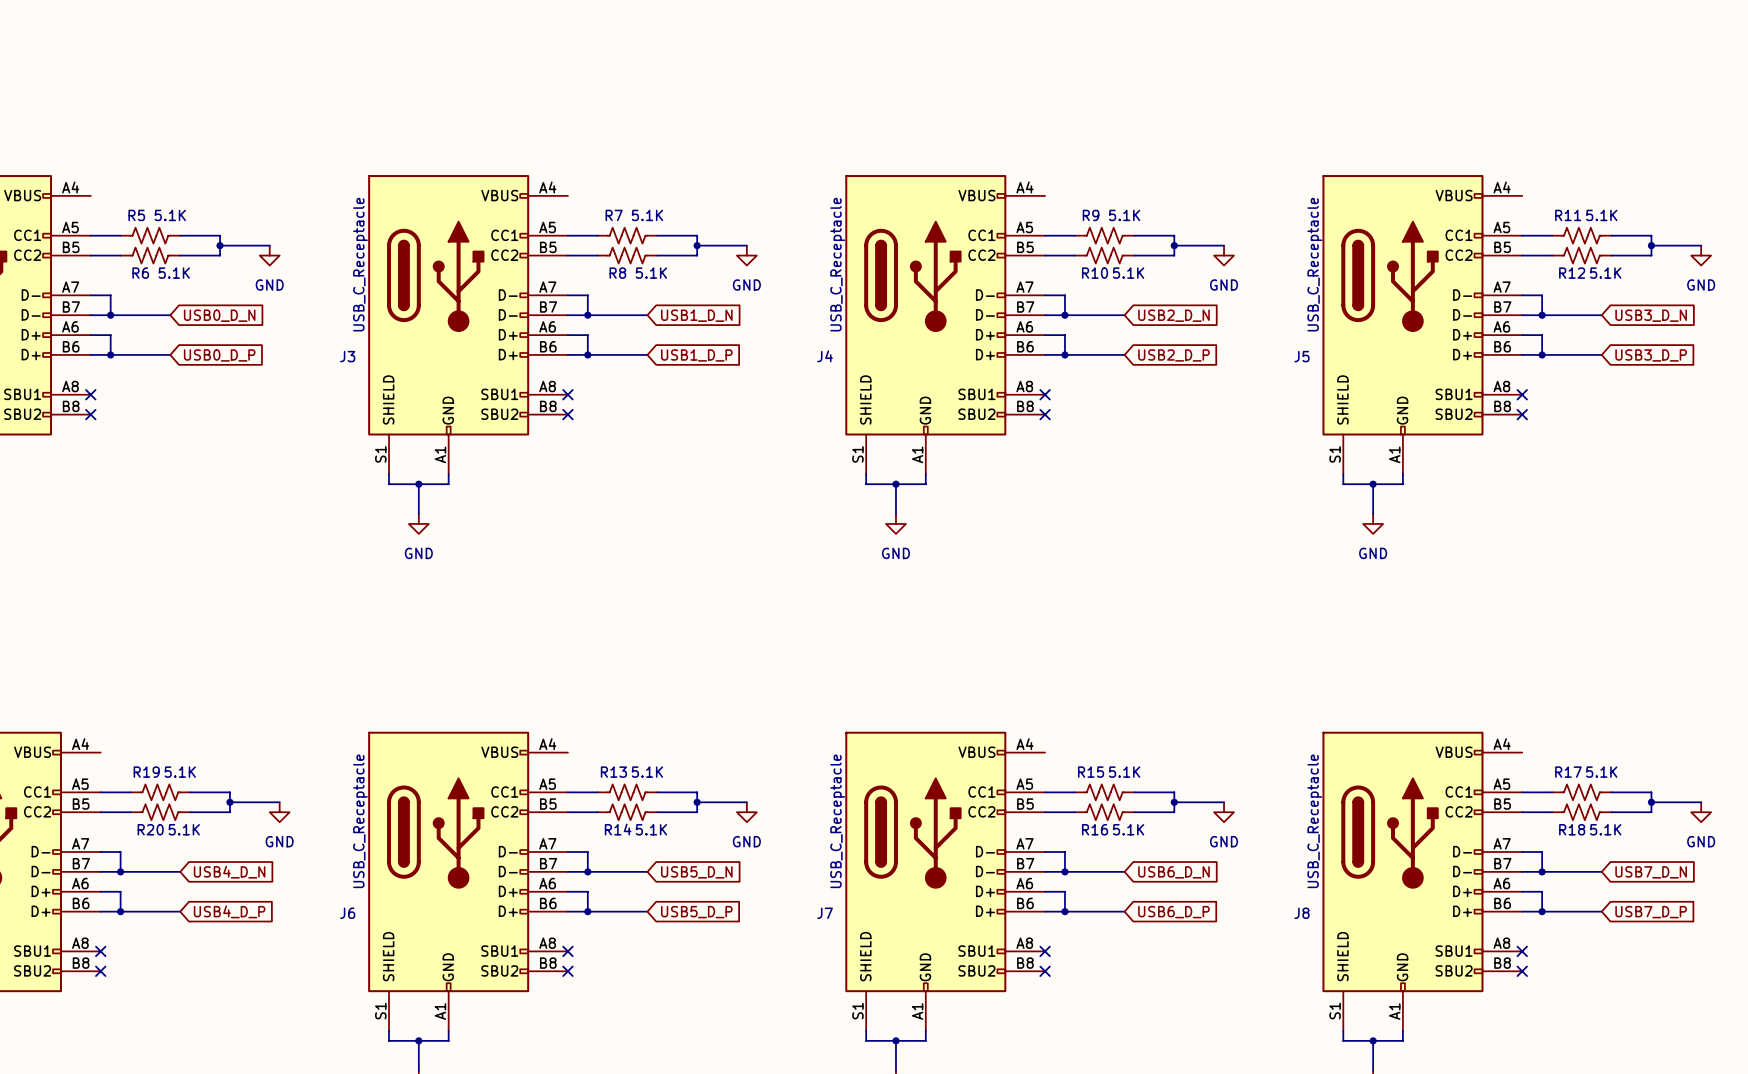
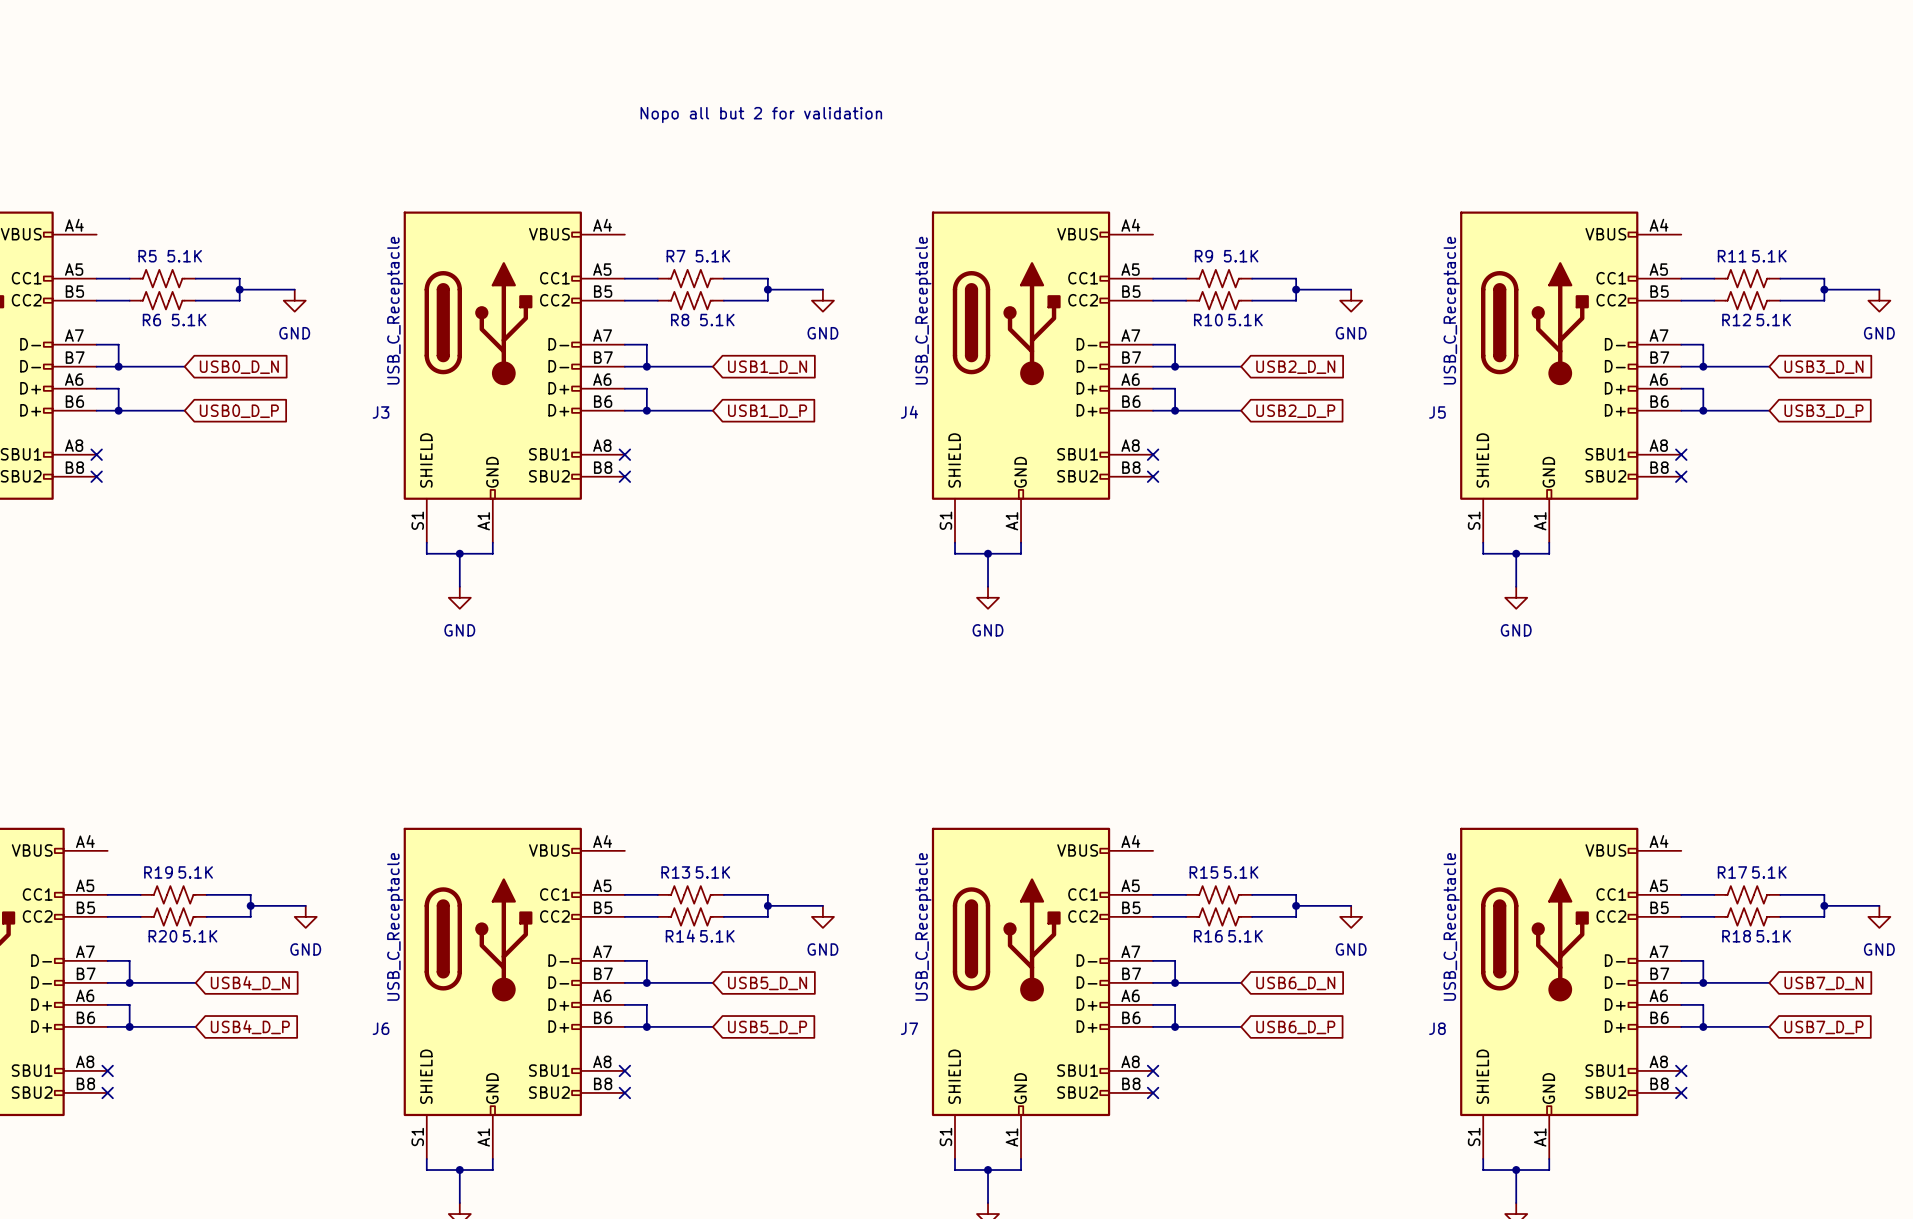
text: none -> Nopo all but 2 for validation (761, 115)

